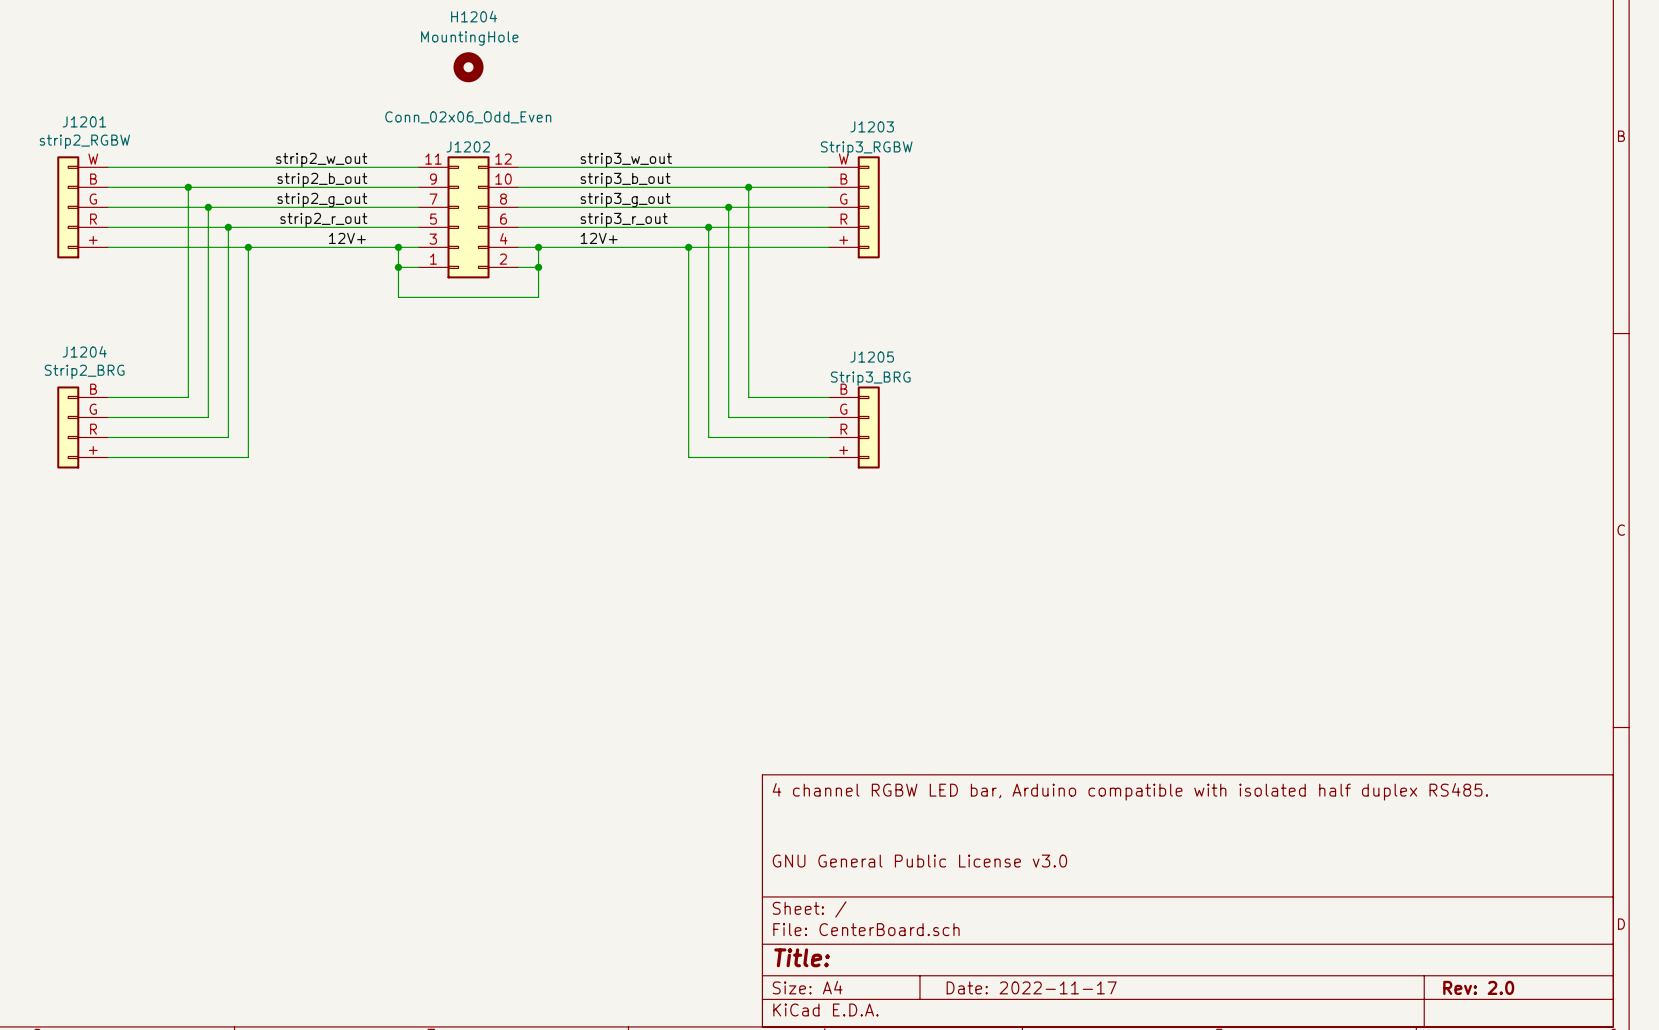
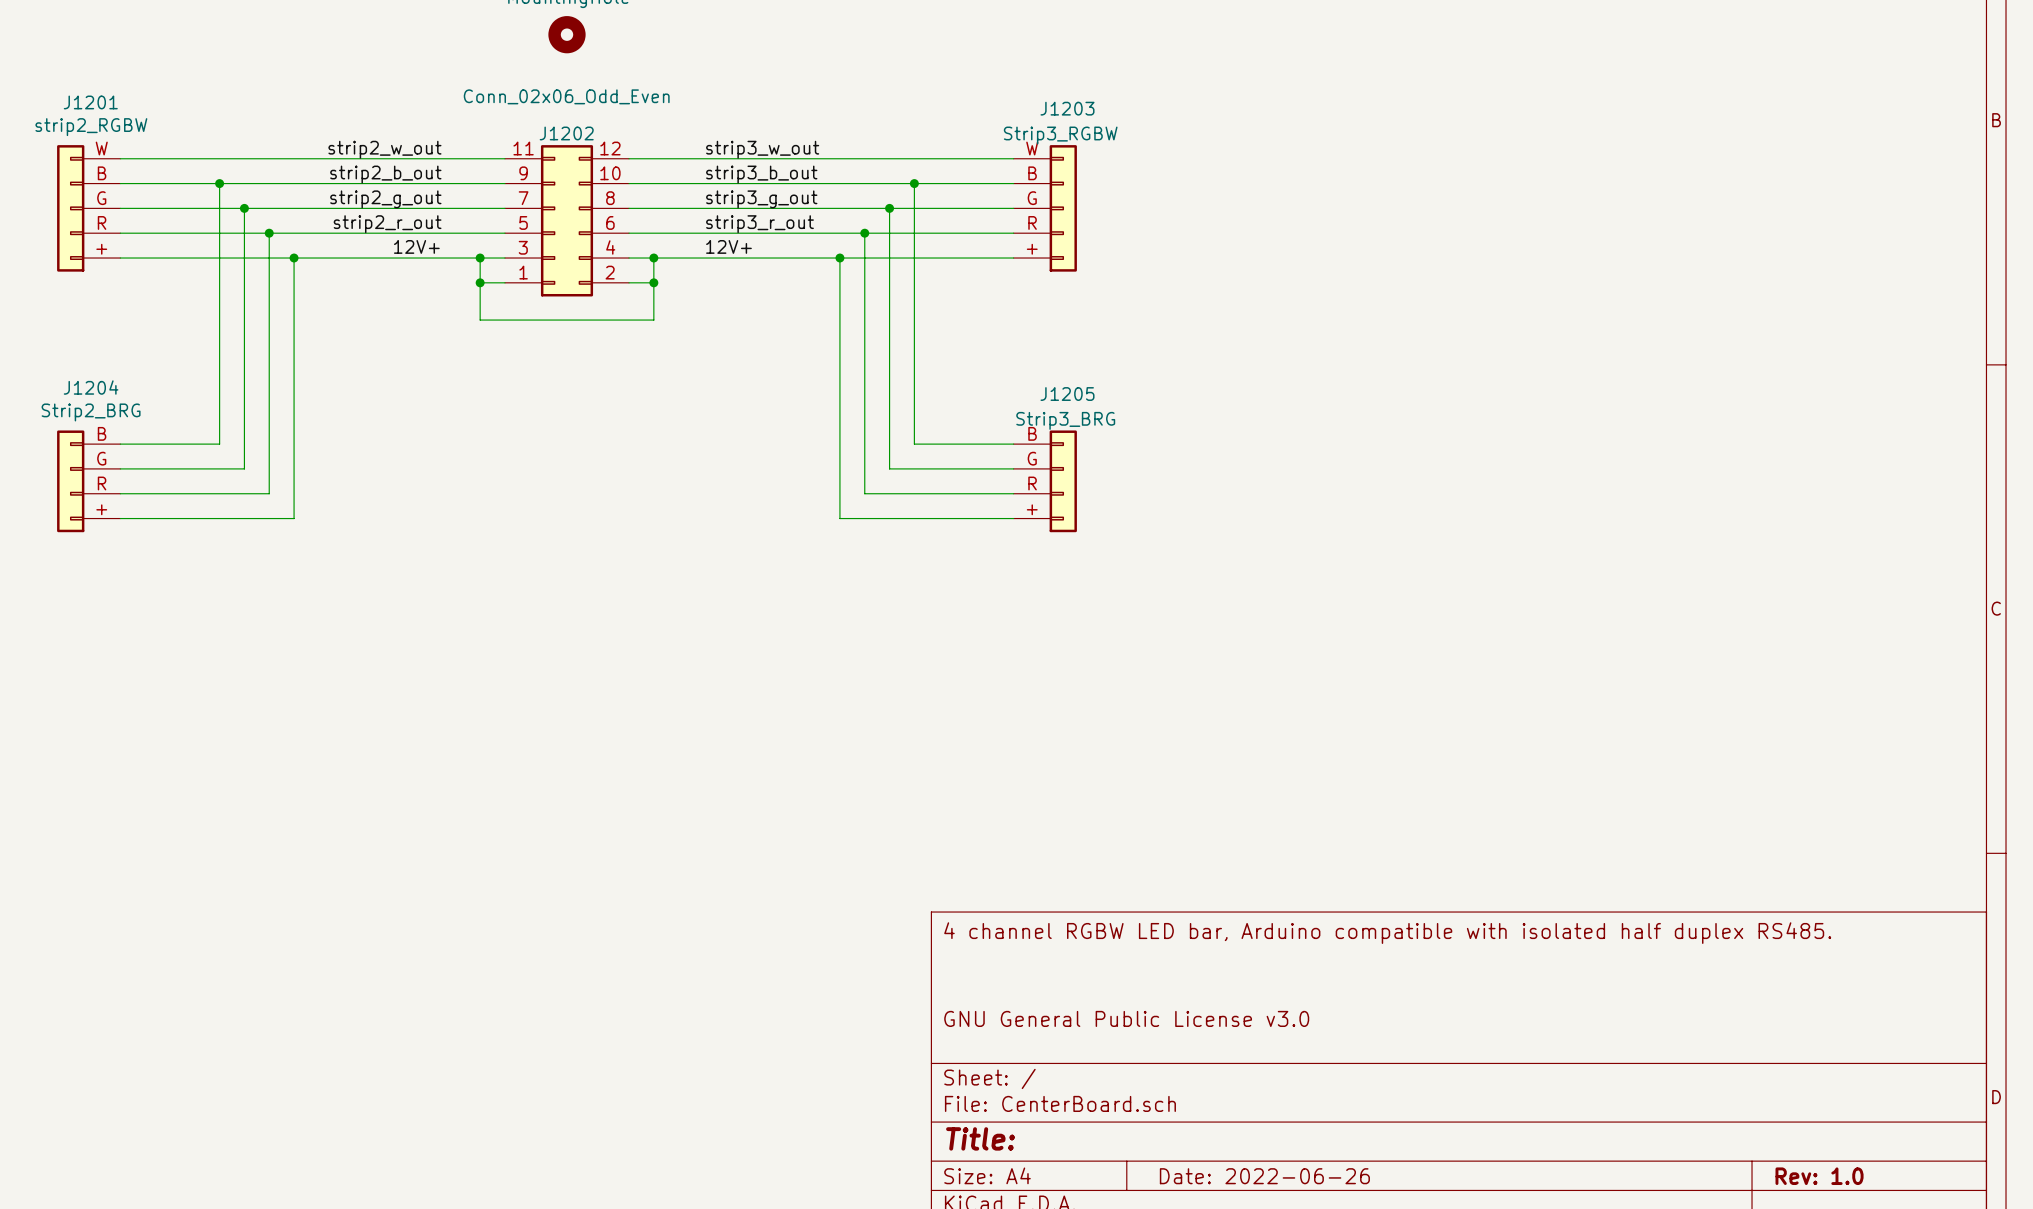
title block: Date: 2022-11-17 (1031, 987) -> Date: 2022-06-26 (1264, 1176)
title block: Rev: 2.0 (1478, 987) -> Rev: 1.0 (1819, 1176)

